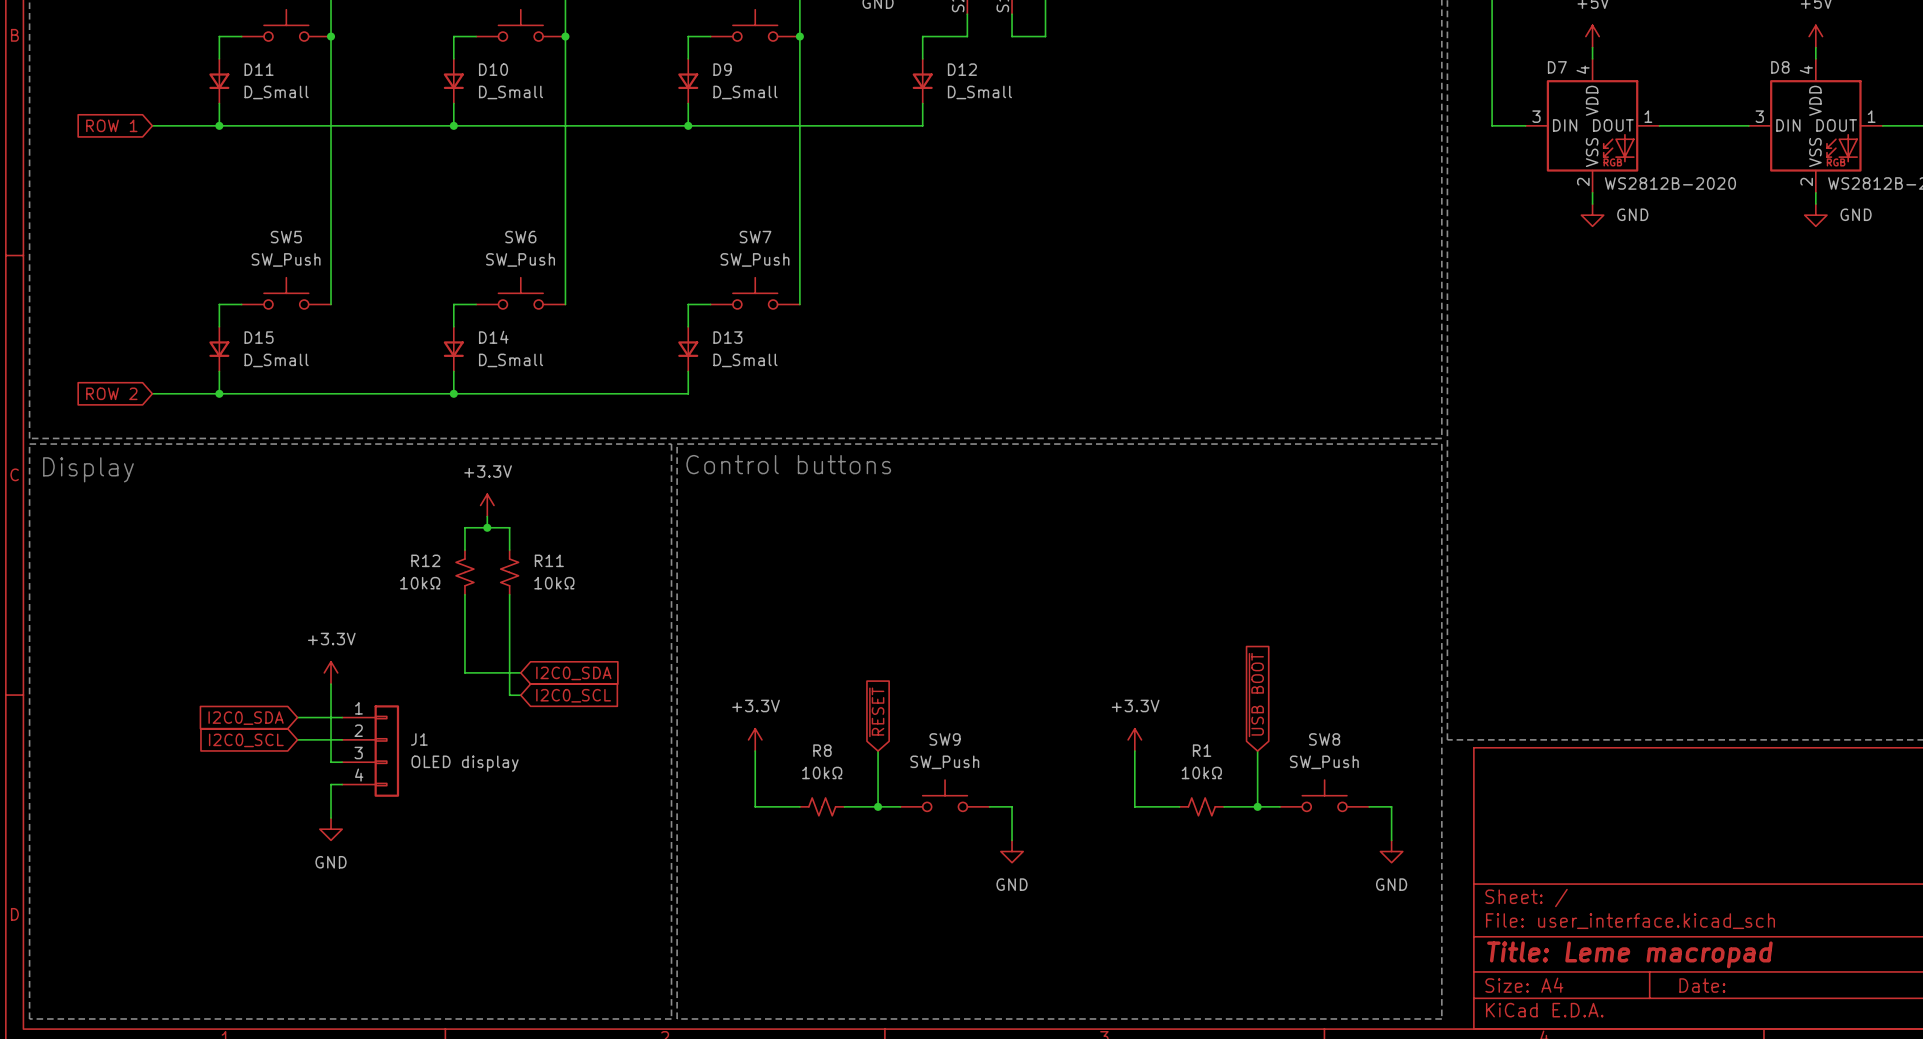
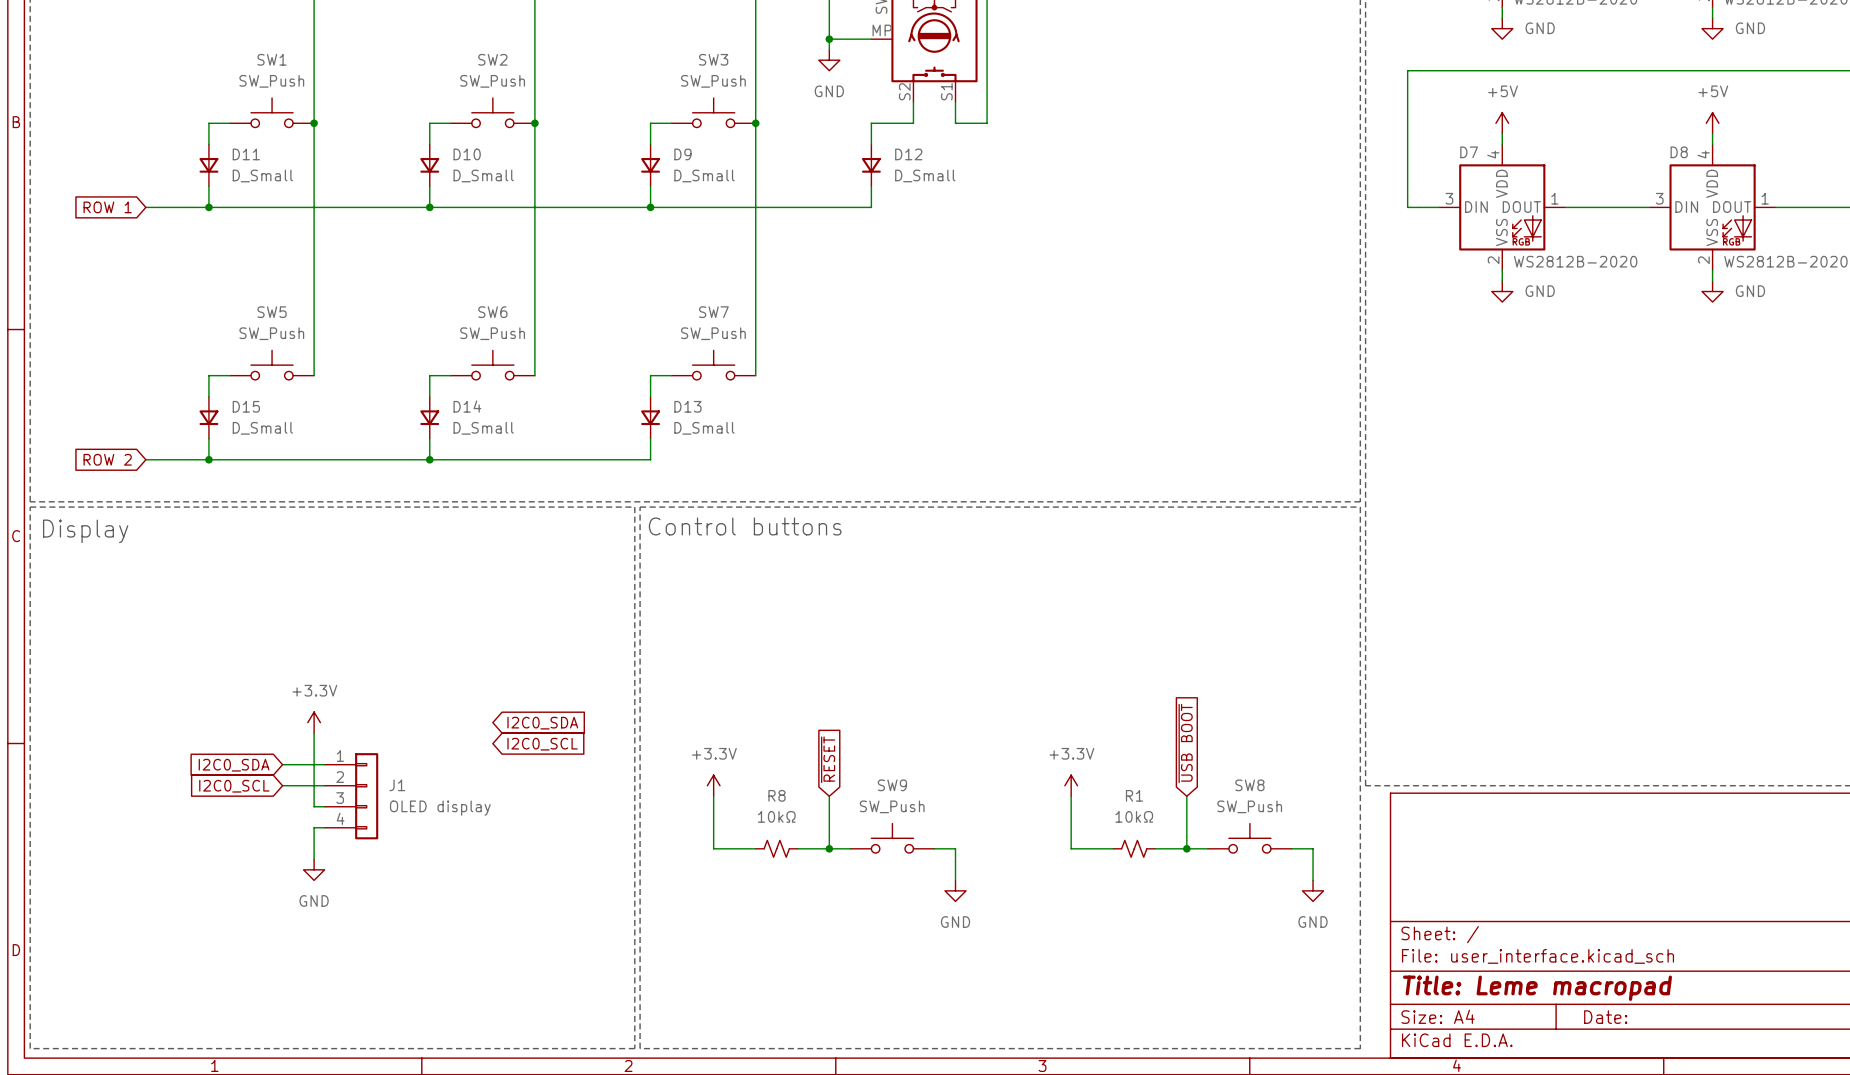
power symbol: +3.3V (487, 505) -> none
wire: (487, 516) (487, 527) -> none
junction: (487, 527) -> none
wire: (464, 550) (464, 527) (509, 527) (509, 550) -> none
R12: 10kΩ (464, 572) -> none
R11: 10kΩ (509, 572) -> none
wire: (464, 594) (464, 672) (520, 672) -> none
wire: (509, 594) (509, 695) (520, 695) -> none

